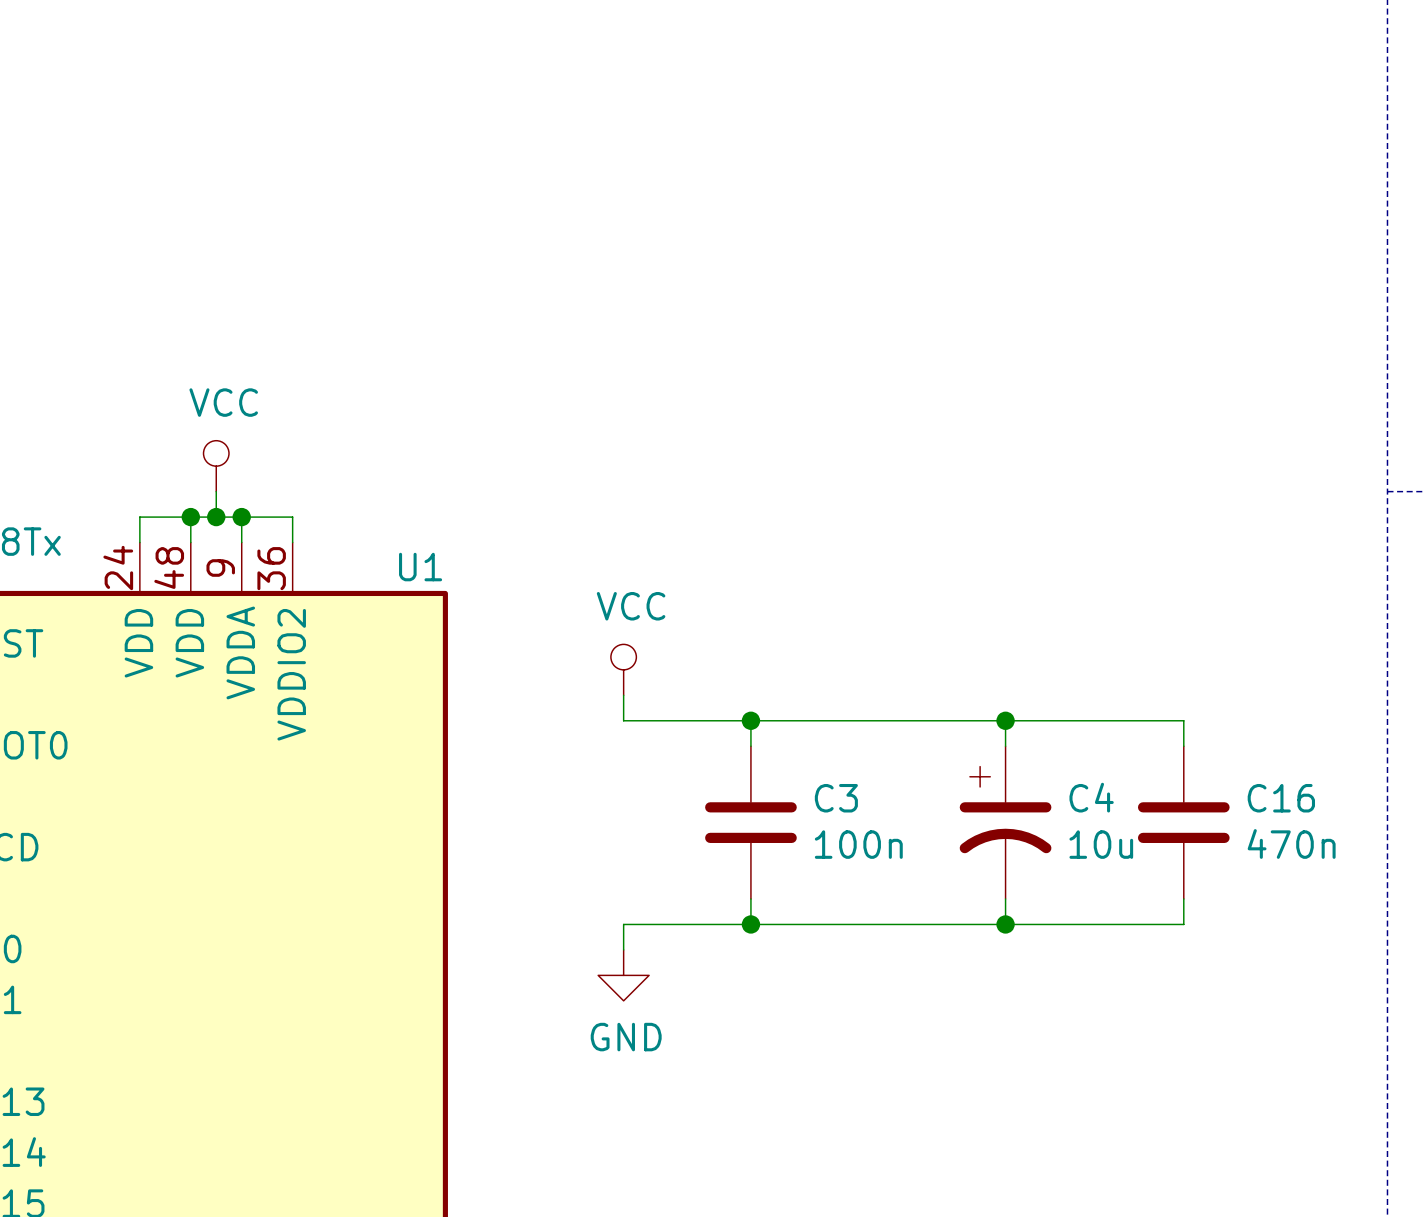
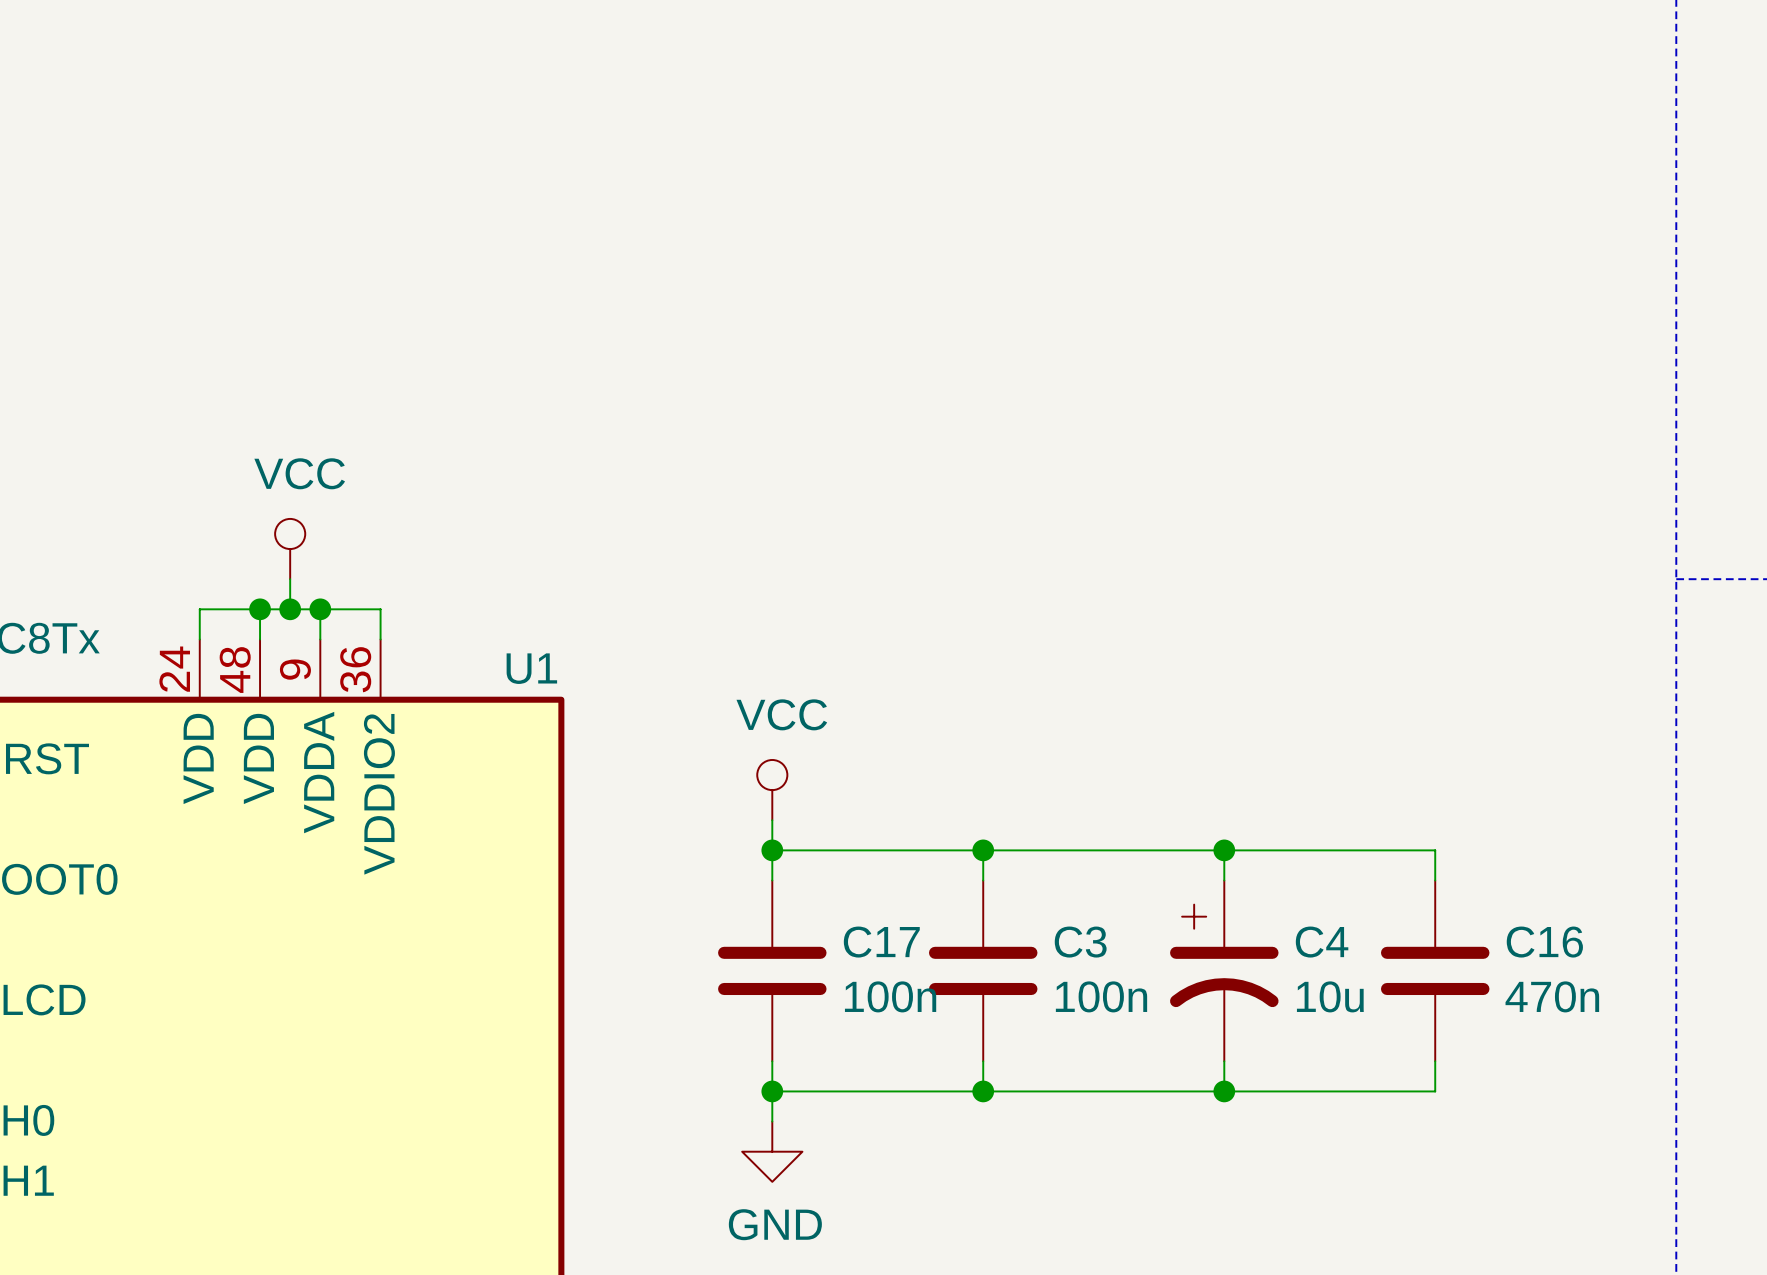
wire: none -> (772, 850) (772, 880)
junction: none -> (772, 850)
wire: (750, 720) (750, 746) -> (983, 850) (983, 880)
junction position: (750, 720) -> (983, 850)
C17: none -> 100n (772, 970)
C3 position: (750, 822) -> (983, 970)
wire: none -> (772, 1061) (772, 1091)
wire: (750, 899) (750, 924) -> (983, 1061) (983, 1091)
junction: none -> (772, 1091)
junction position: (750, 924) -> (983, 1091)

